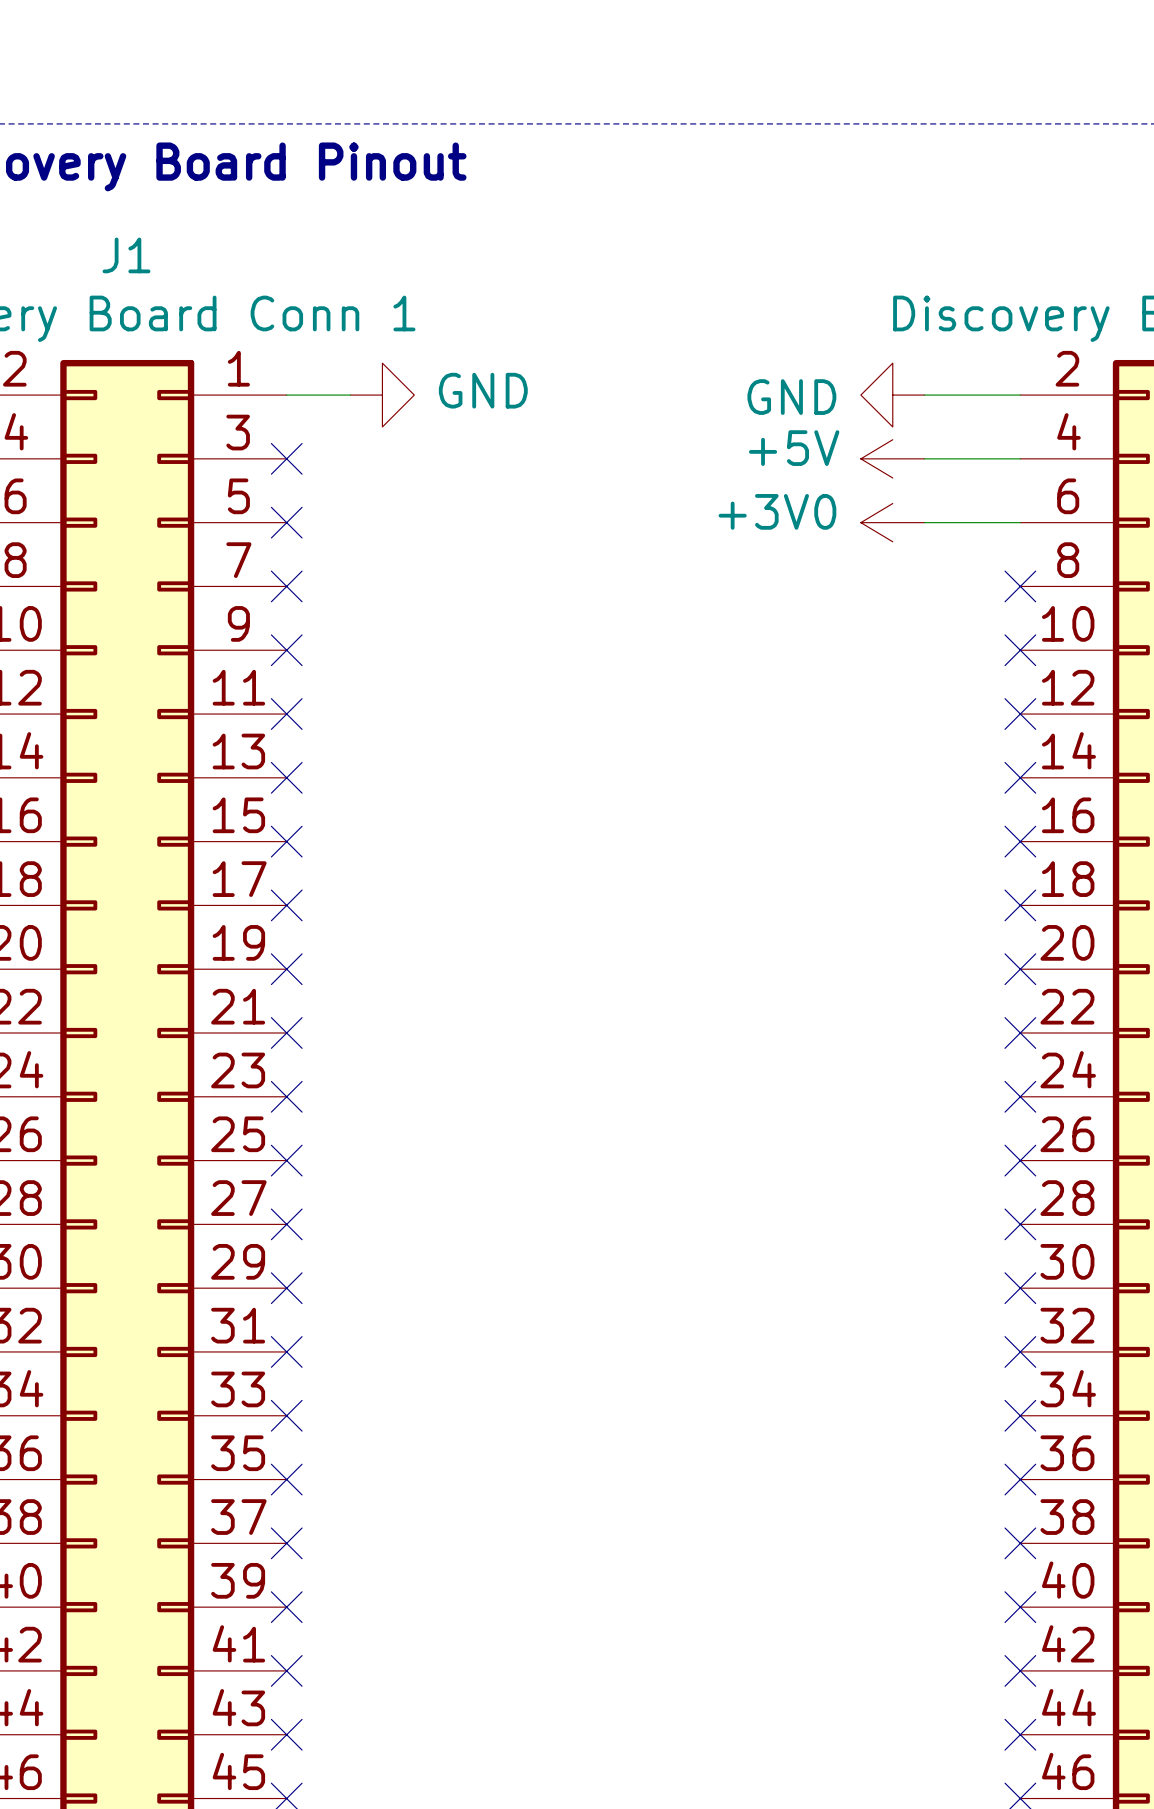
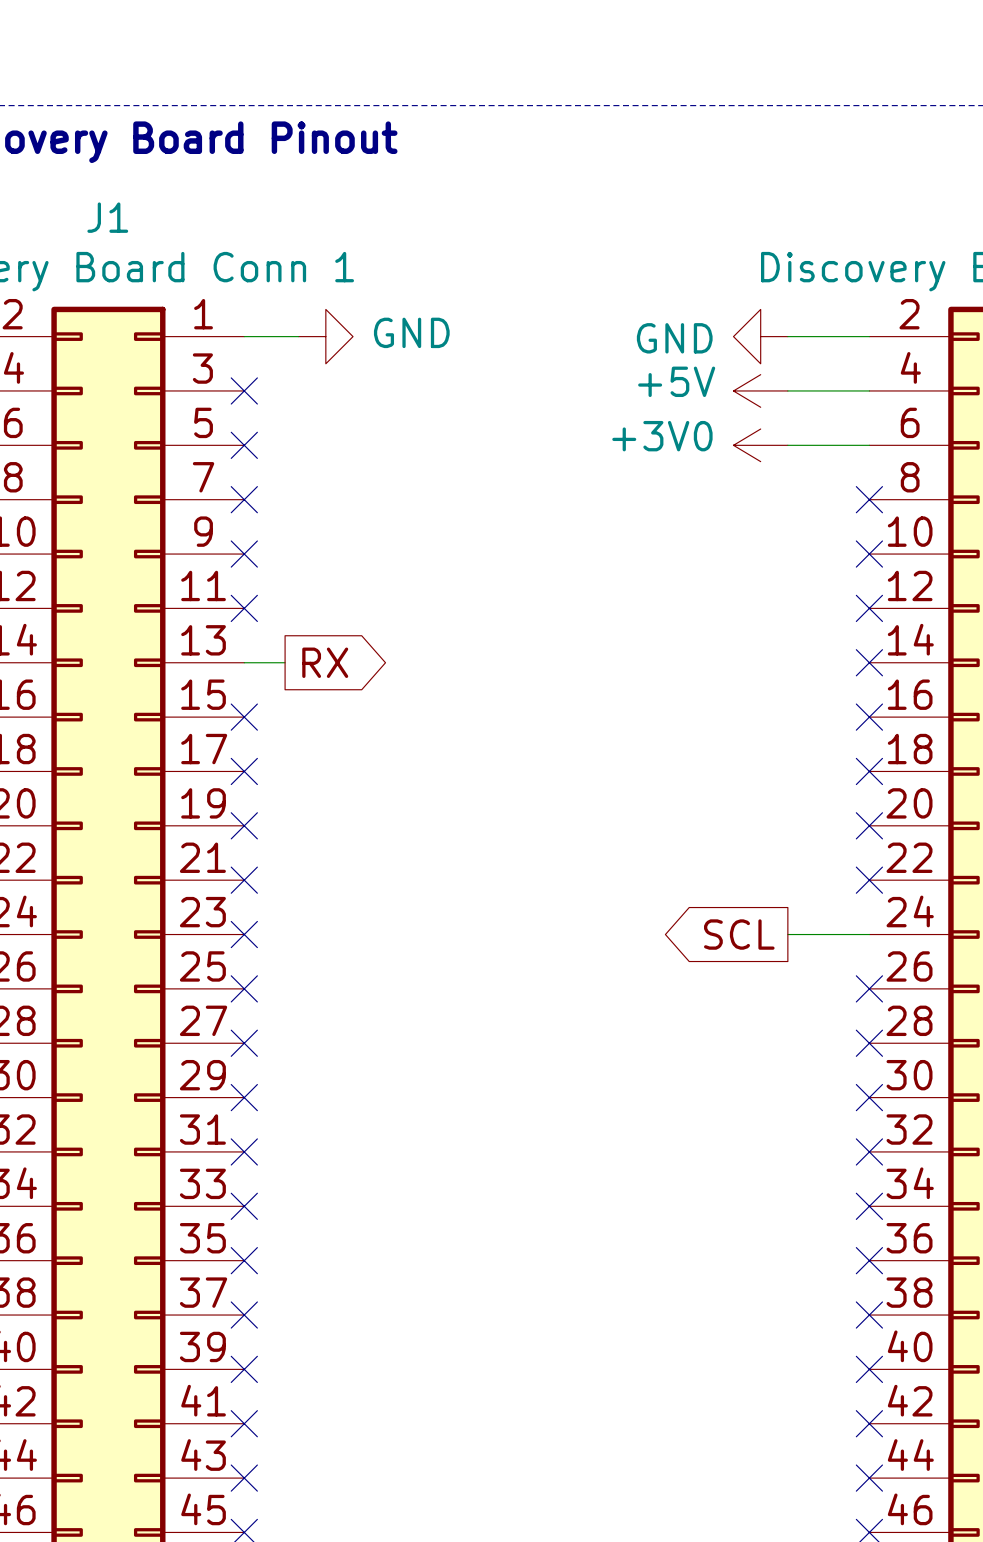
wire: none -> (244, 662) (285, 662)
no-connect mark: (286, 777) -> none
global label: none -> RX (325, 662)
global label: none -> SCL (739, 934)
wire: none -> (787, 934) (869, 934)
no-connect mark: (1020, 1096) -> none

